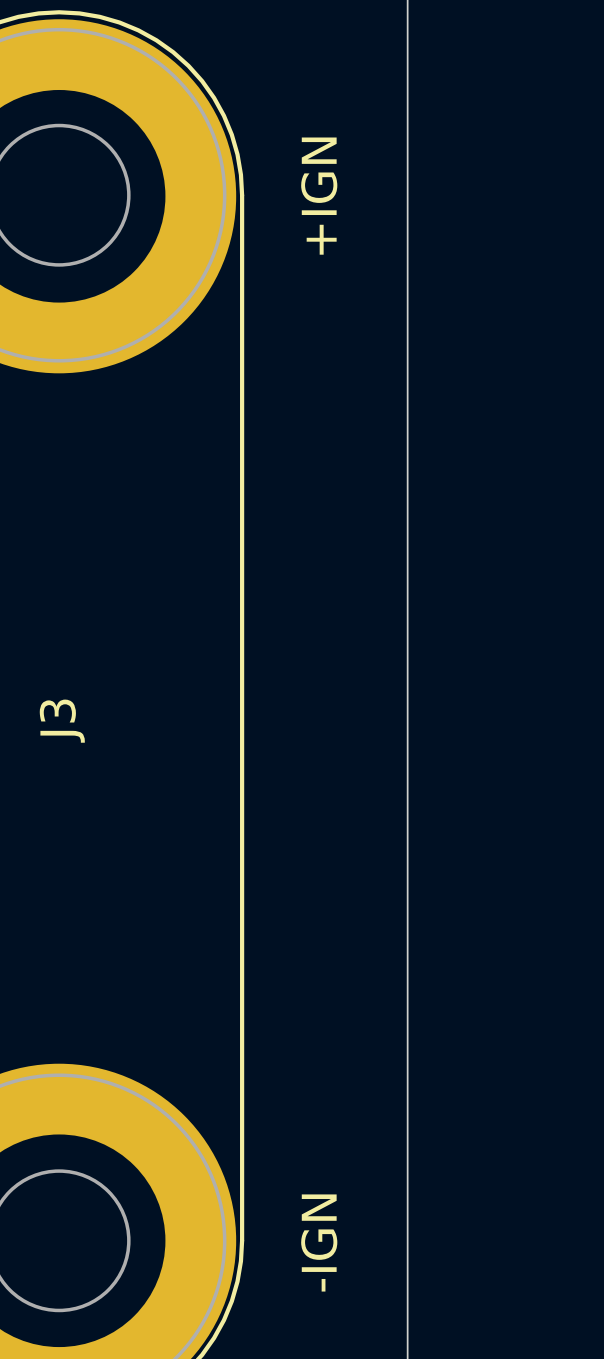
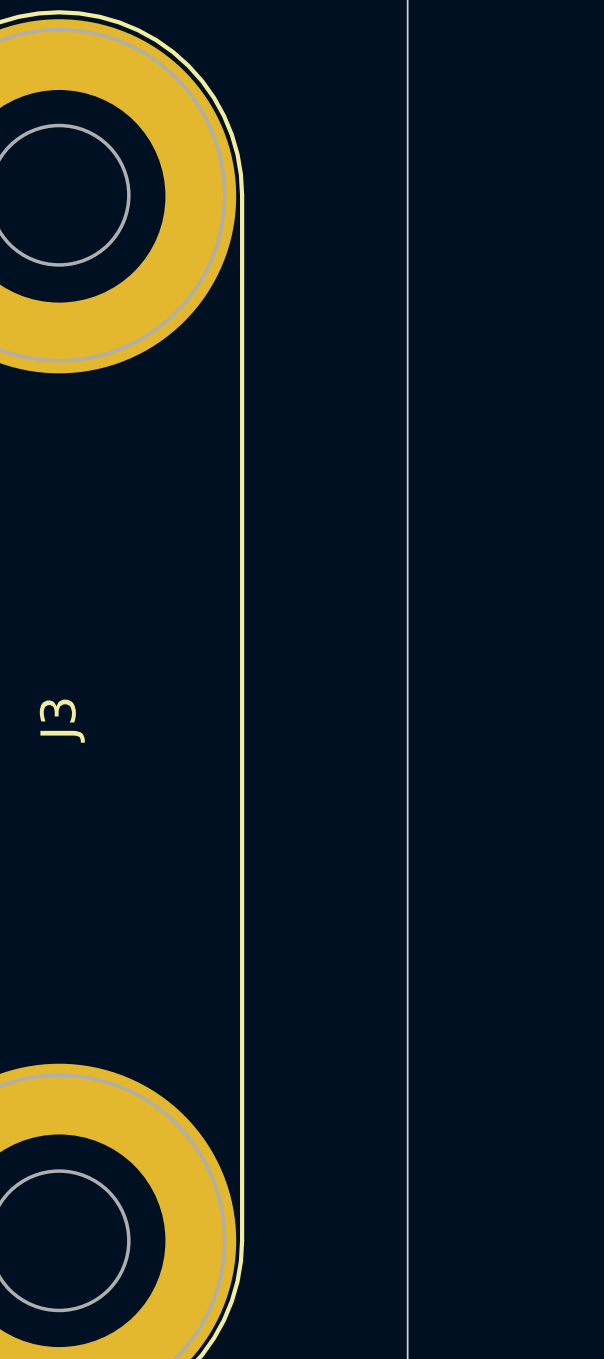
text: +IGN (319, 196) -> none
text: -IGN (319, 1242) -> none

